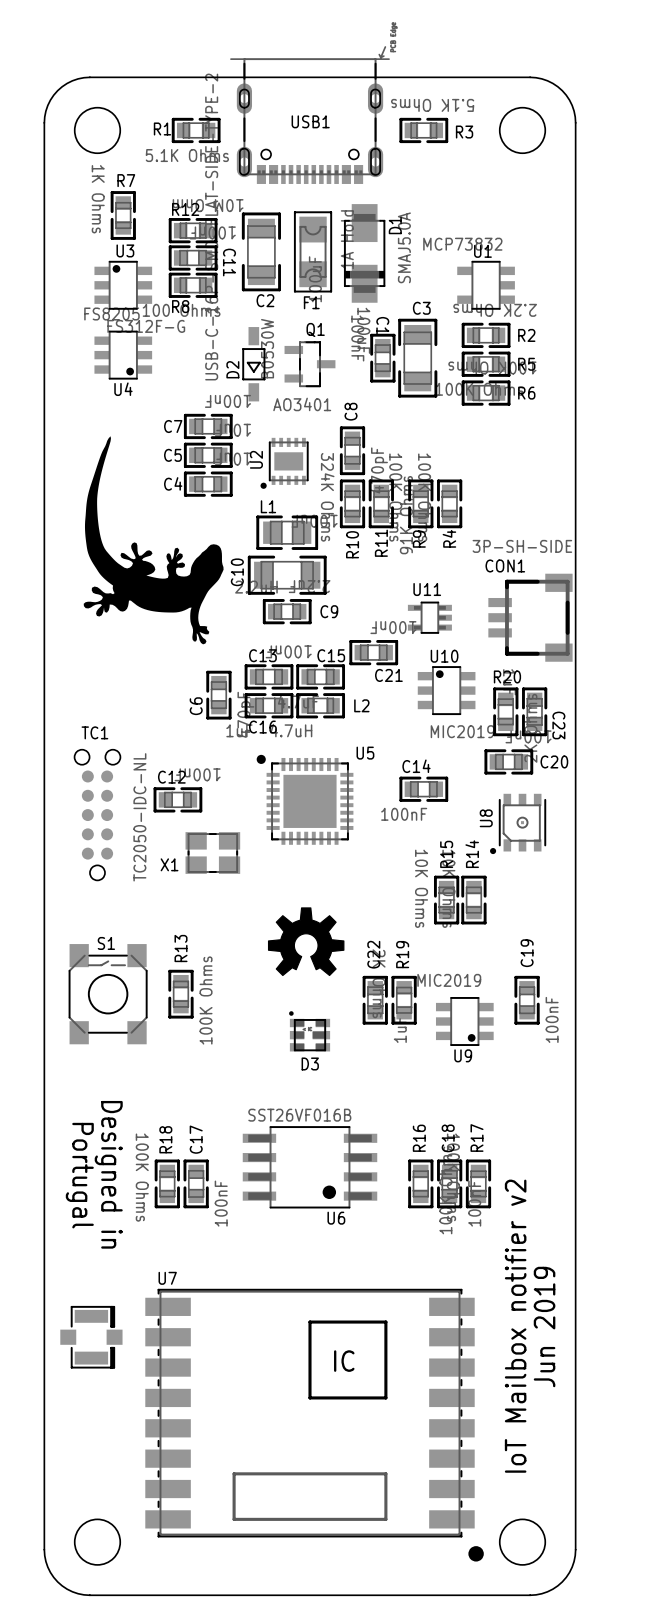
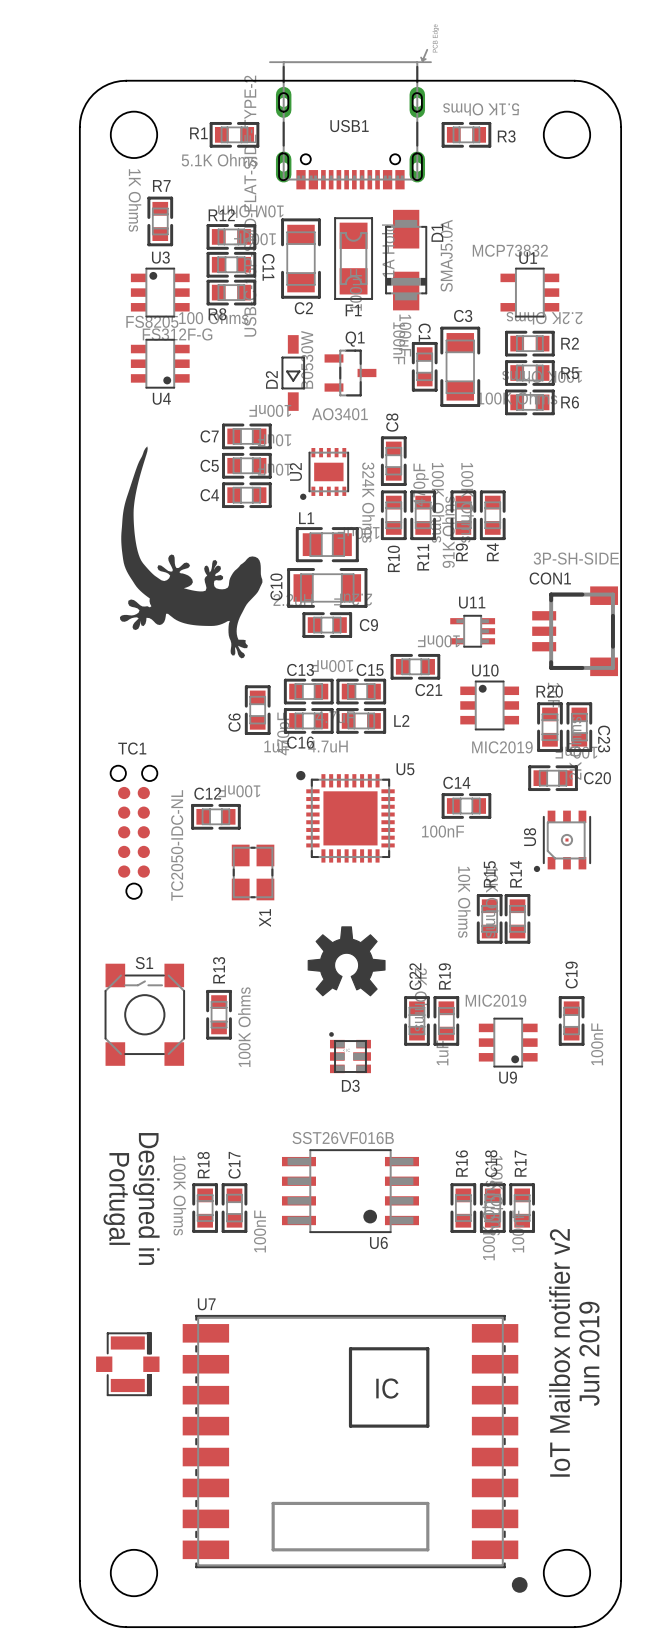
X1 rotation: 0° (212, 853) -> 90° clockwise (253, 872)
X1 name position: X1 (169, 864) -> X1 (265, 918)

